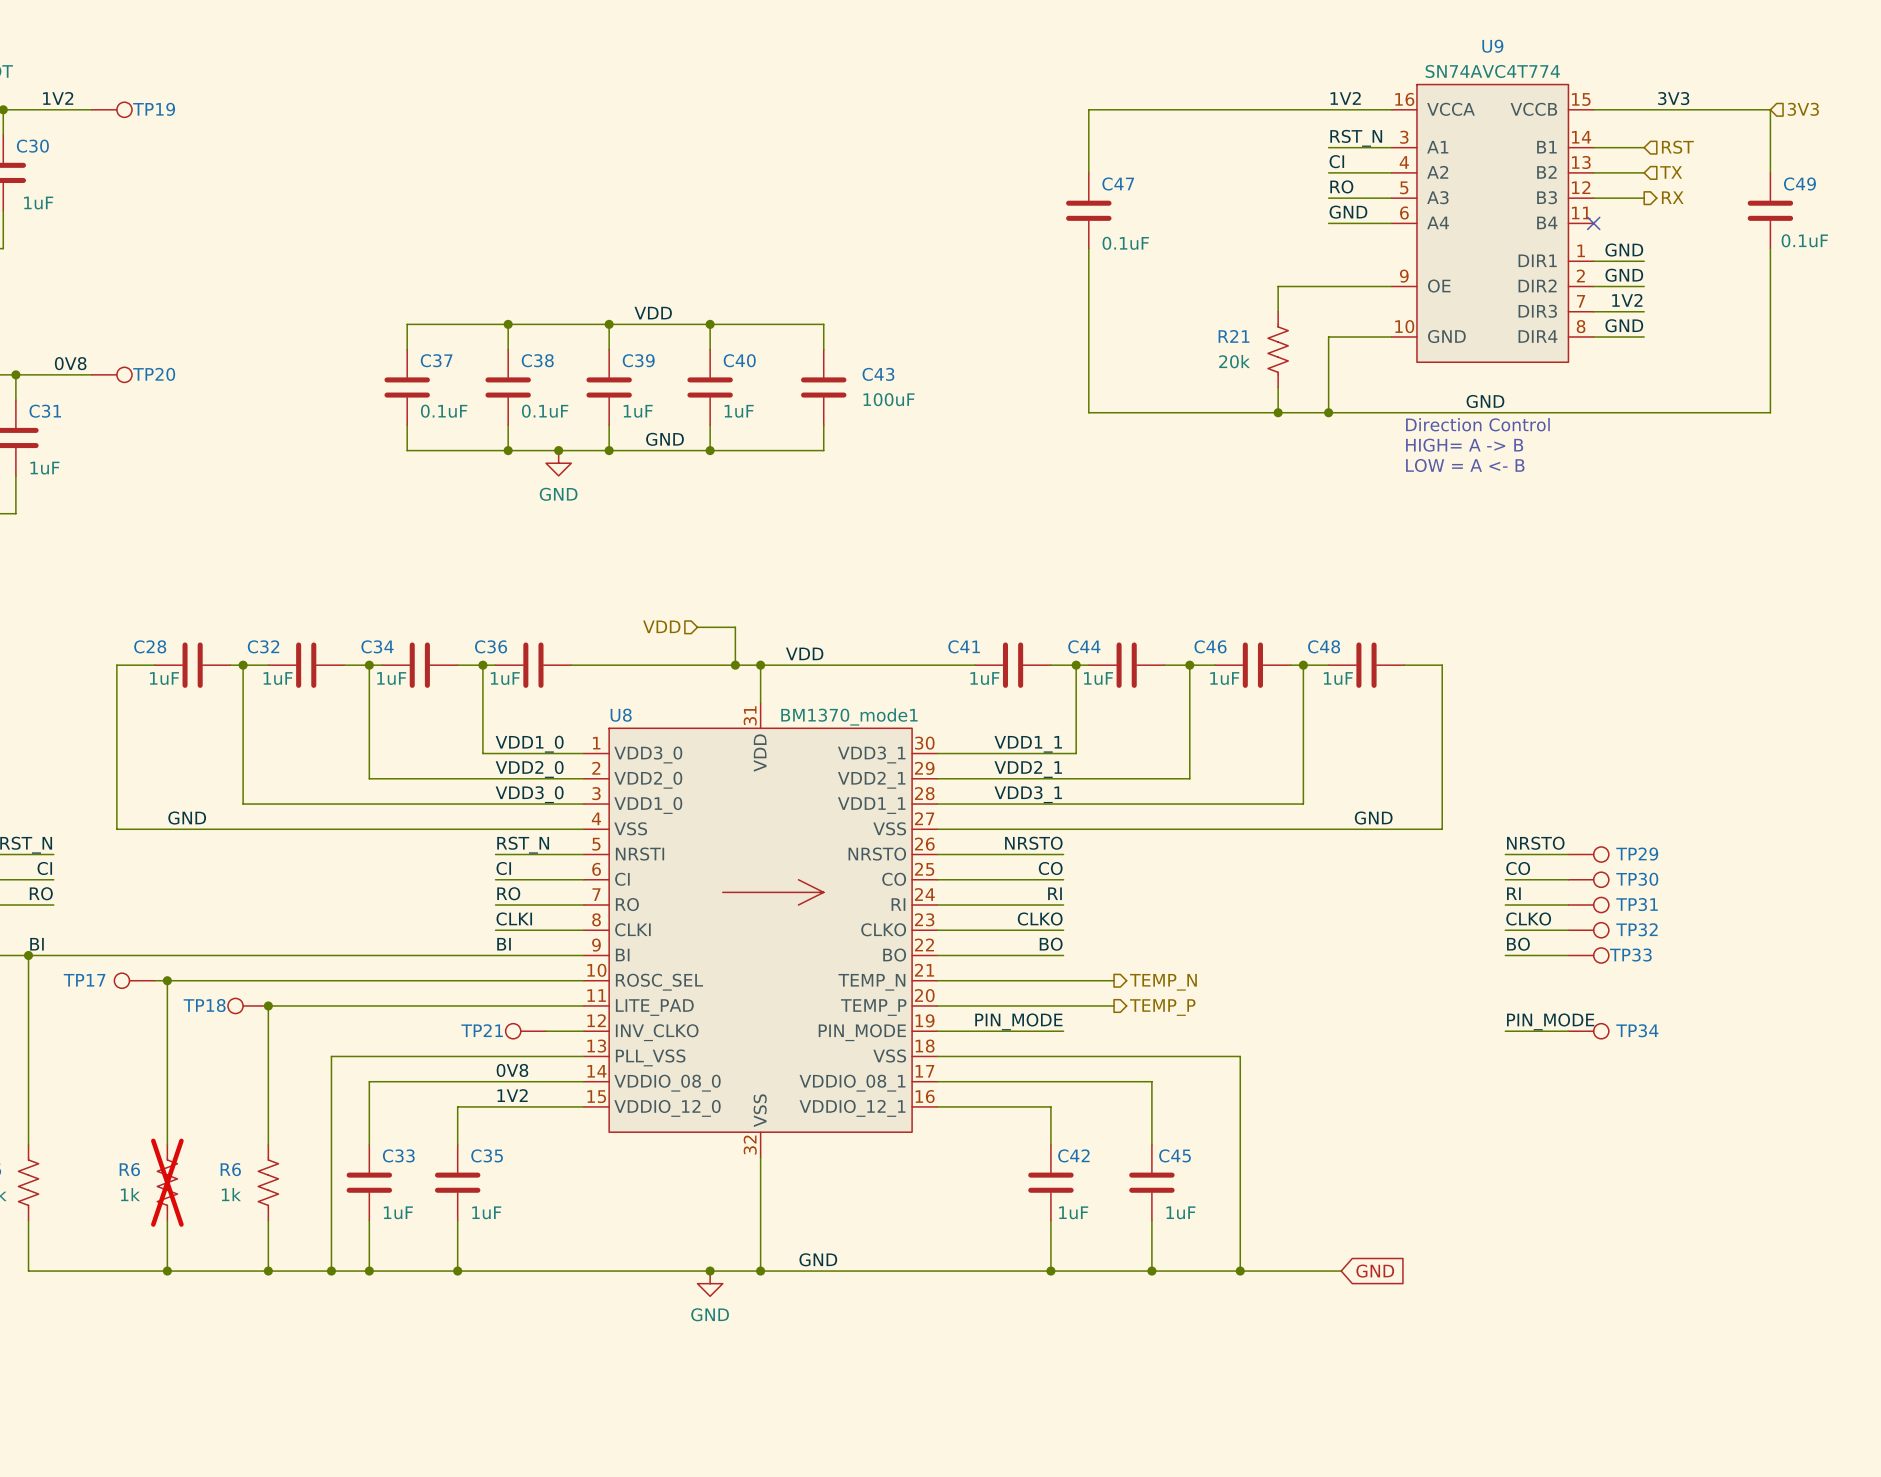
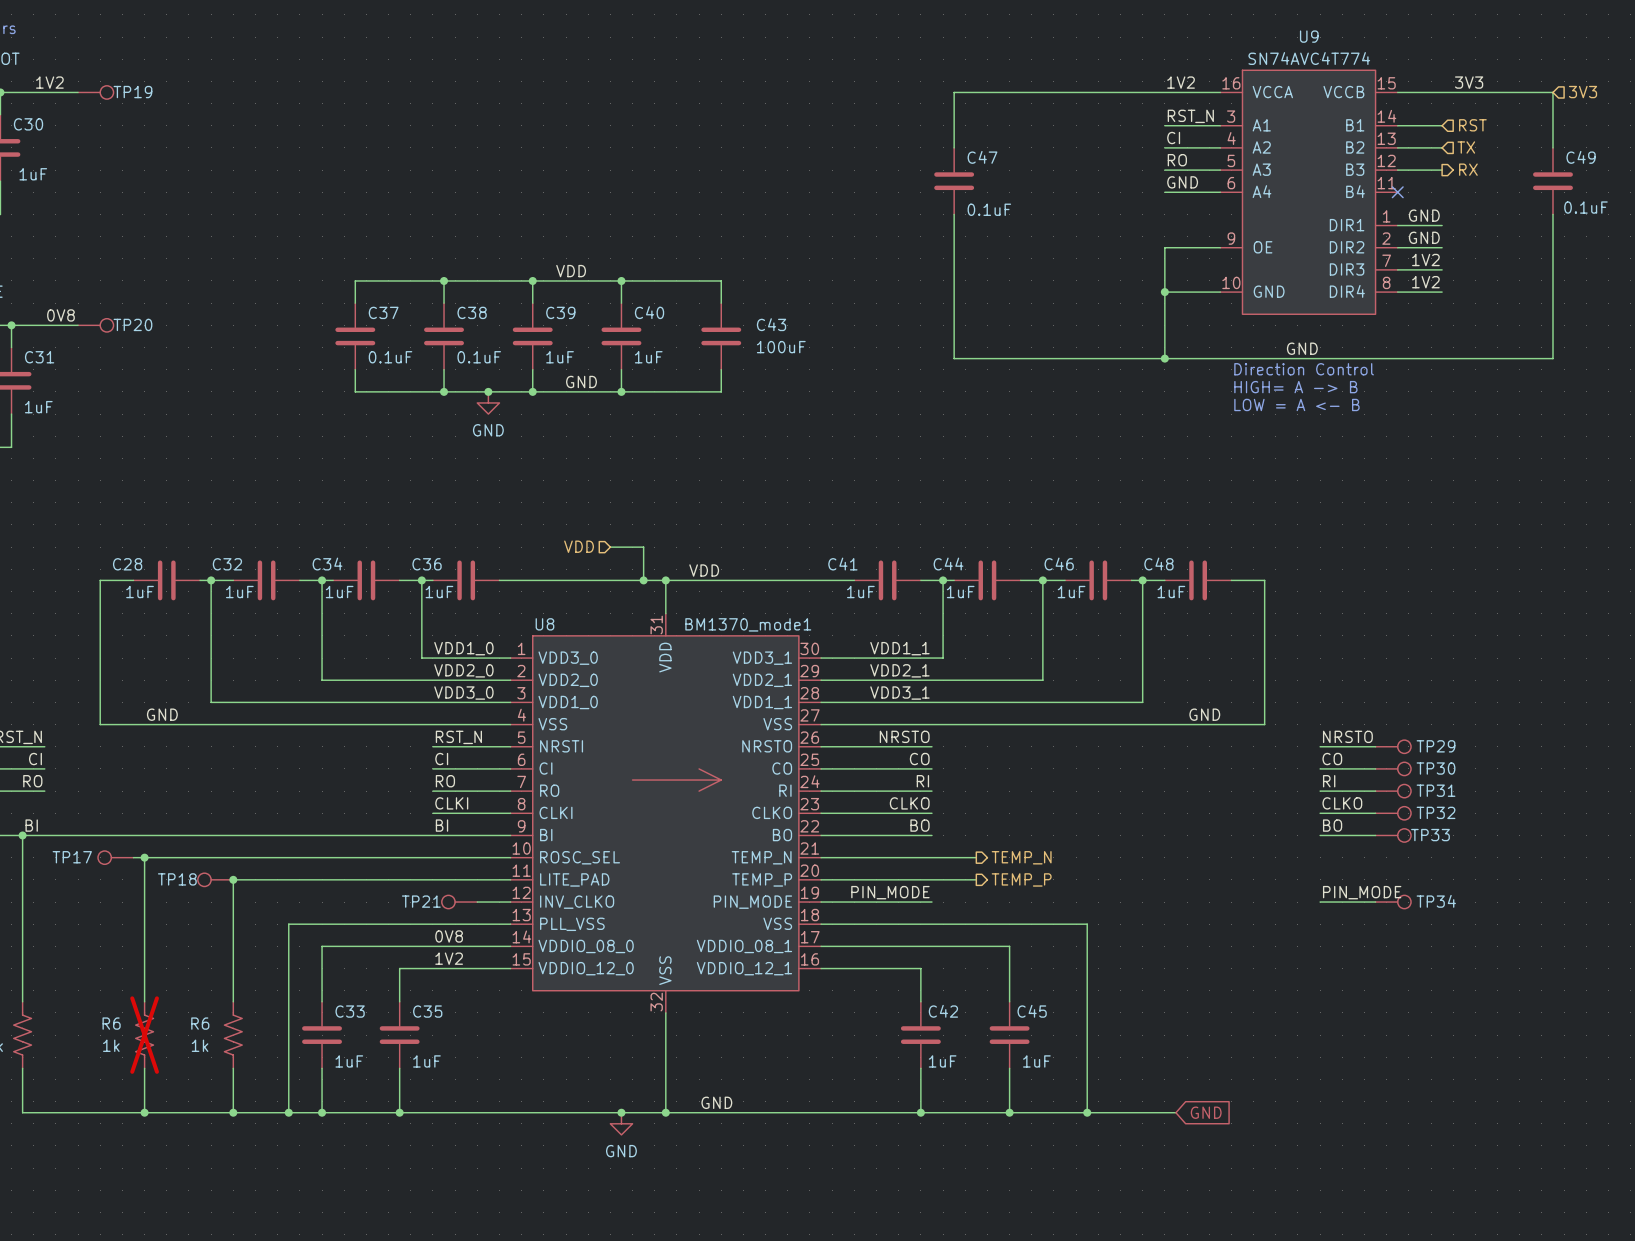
wire: (1328, 286) (1278, 286) (1278, 311) -> (1164, 247) (1164, 292)
label: GND (1624, 325) -> 1V2 (1425, 282)
junction: none -> (1164, 292)
R21: 20k (1278, 349) -> none
wire: (1278, 387) (1278, 412) -> none
junction: (1278, 412) -> none

